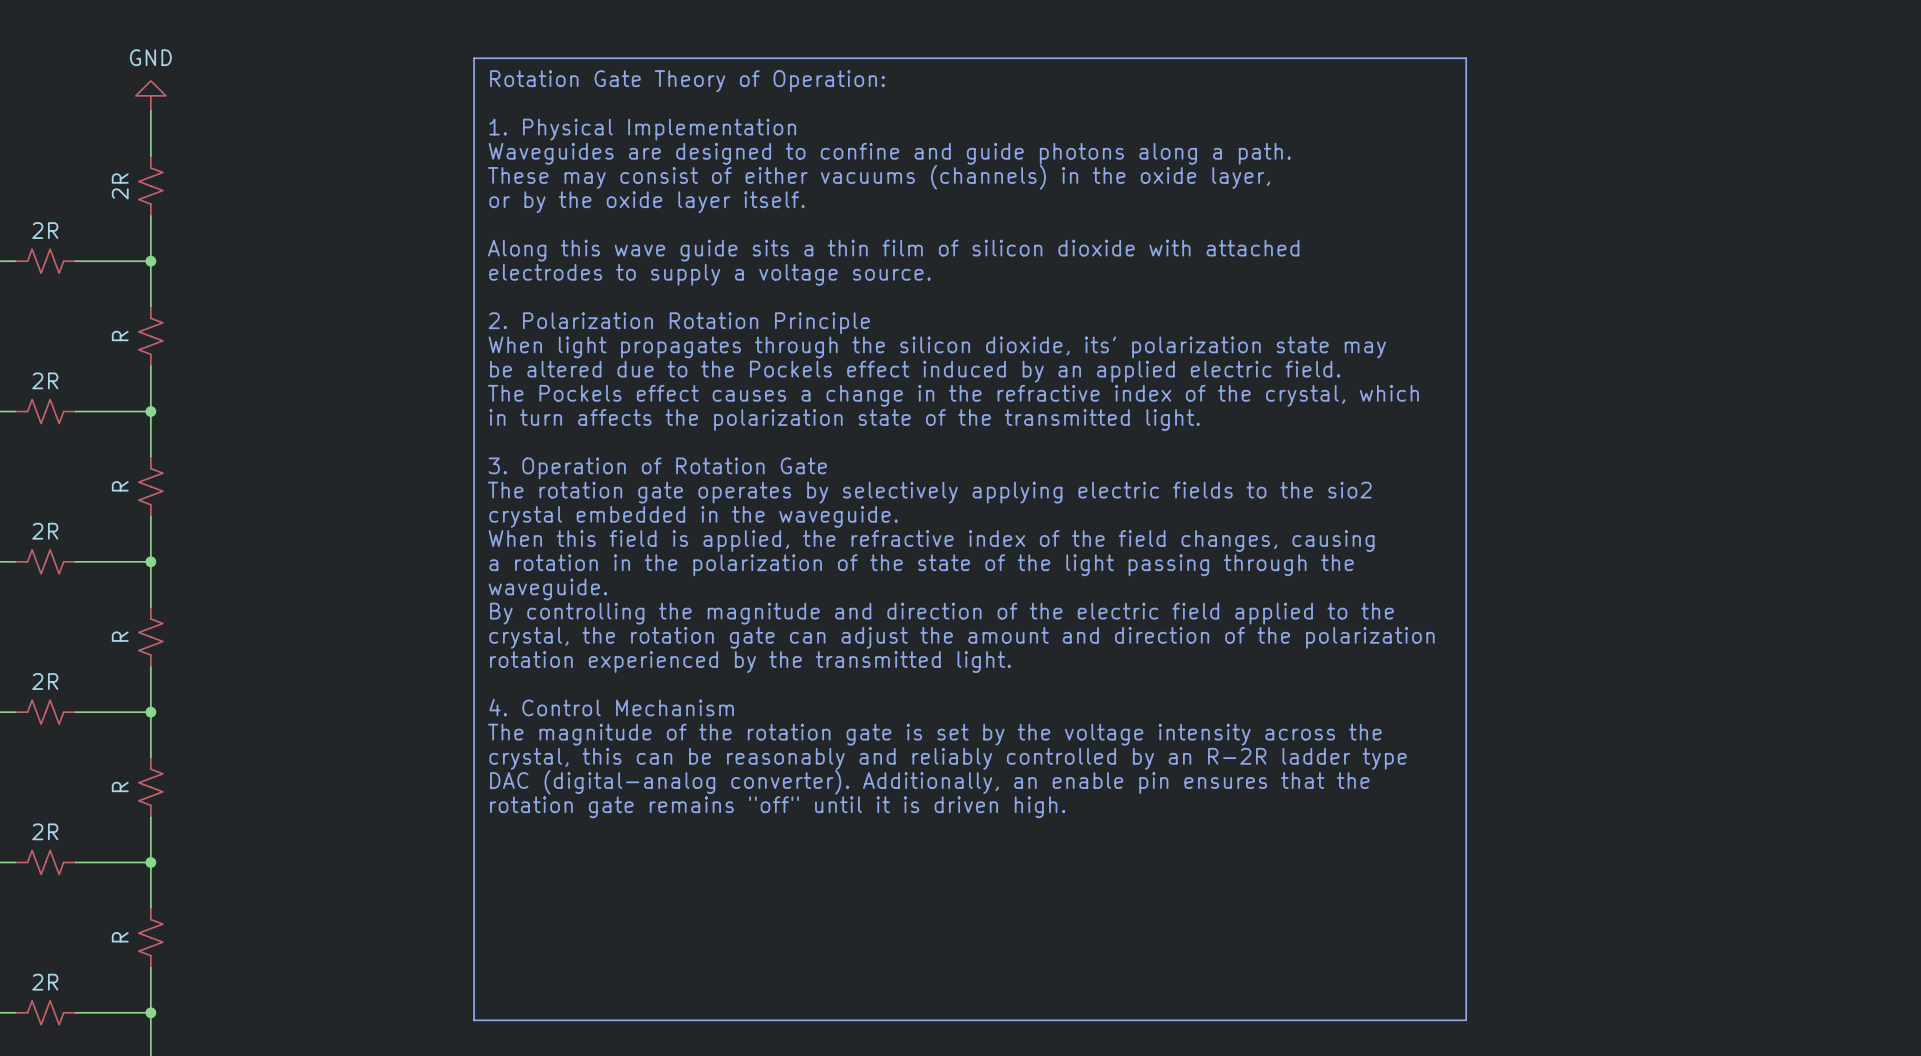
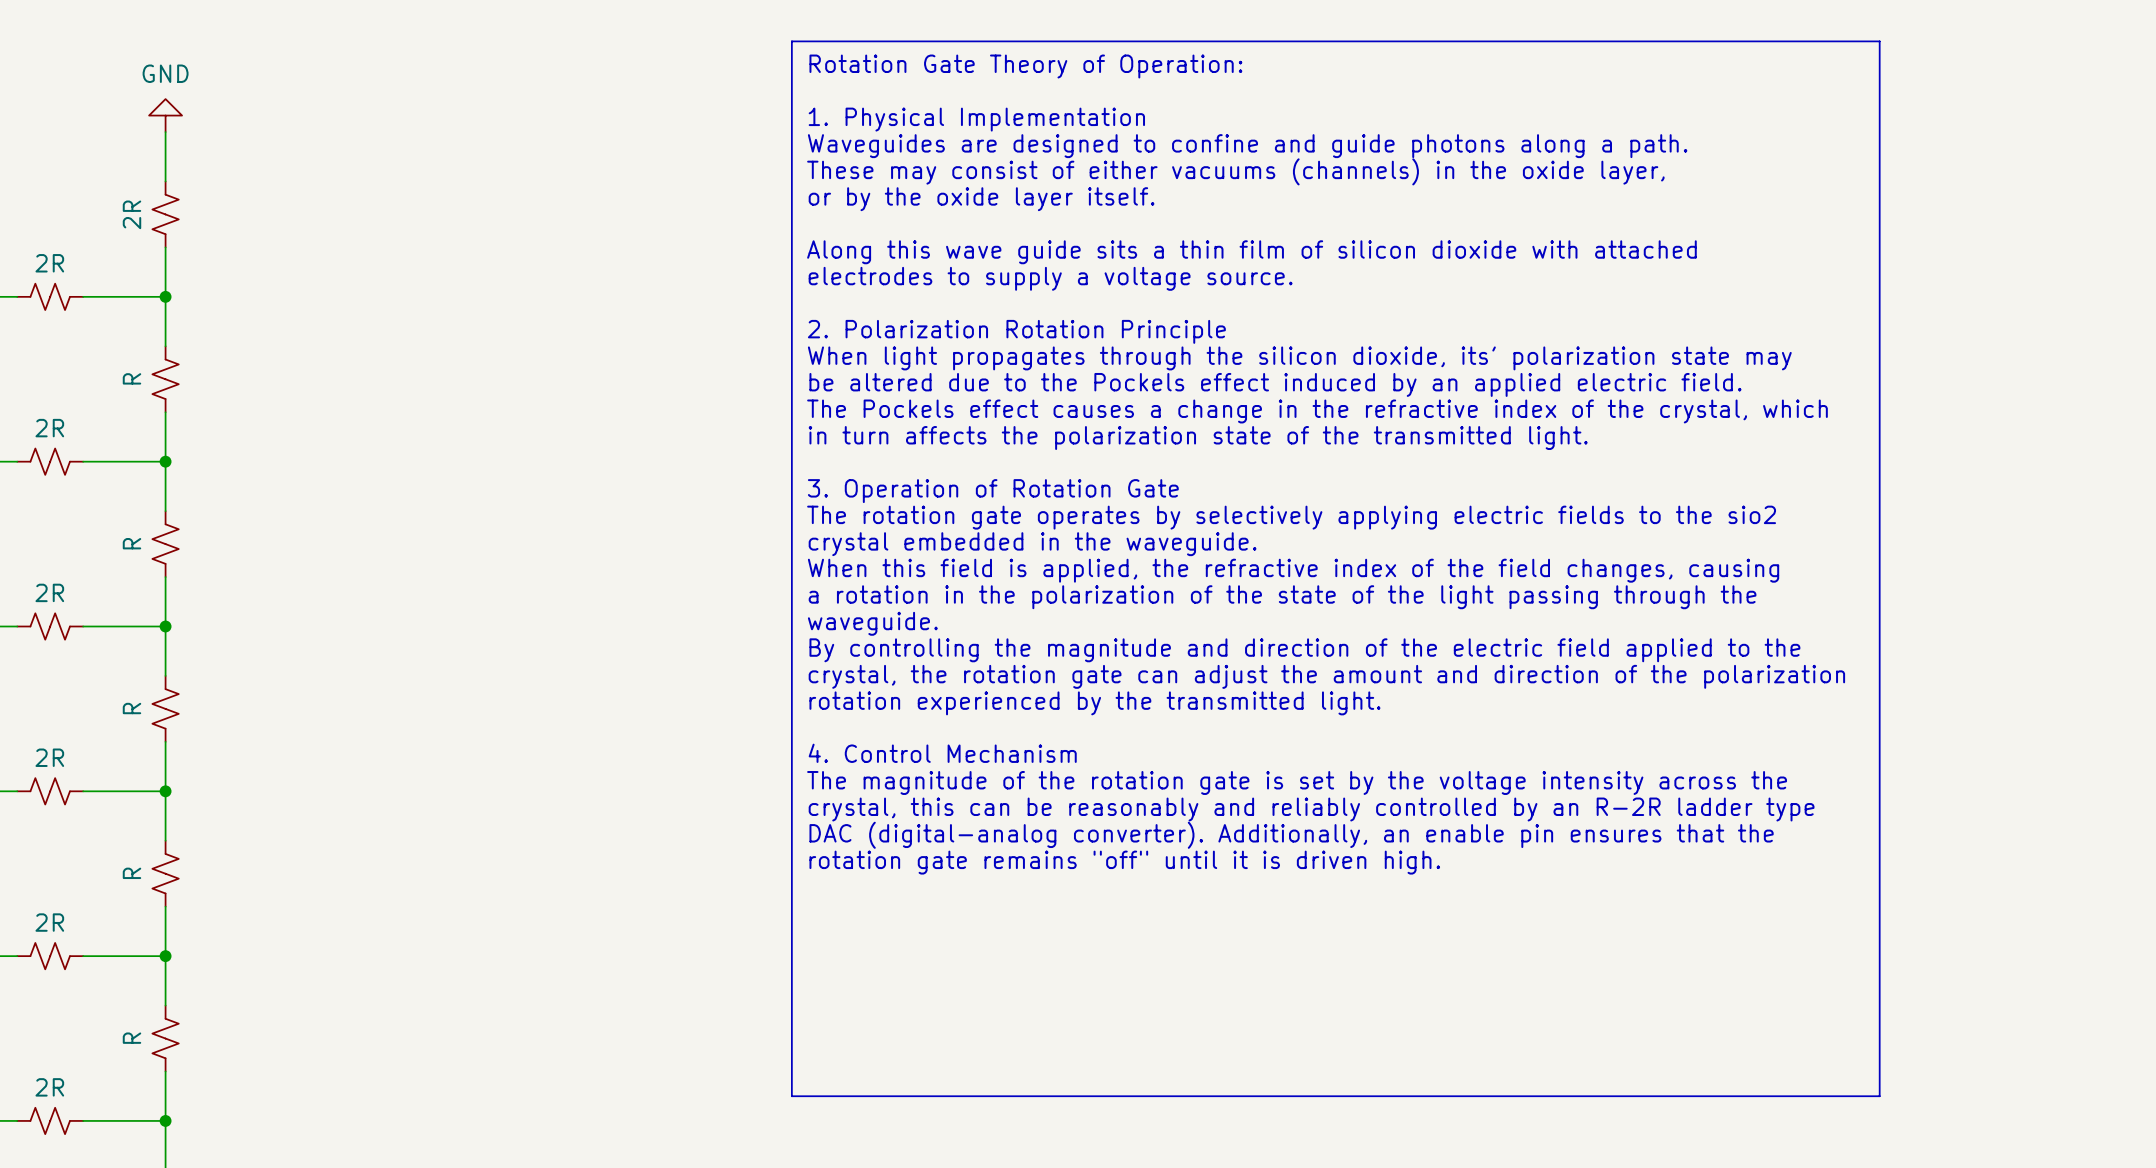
line: (474, 58) (1466, 58) (1466, 1020) (474, 1020) (474, 58) -> (791, 41) (1879, 41) (1879, 1096) (791, 1096) (791, 41)
text position: Rotation Gate Theory of Operation: (687, 81) -> Rotation Gate Theory of Operation: (1025, 66)
text position: 1. Physical Implementation (642, 129) -> 1. Physical Implementation (976, 119)
text position: Waveguides are designed to confine and guide photons along a path. (889, 153) -> Waveguides are designed to confine and guide photons along a path. (1247, 146)
text position: These may consist of either vacuums (channels) in the oxide layer, (878, 177) -> These may consist of either vacuums (channels) in the oxide layer, (1235, 171)
text position: or by the oxide layer itself. (647, 202) -> or by the oxide layer itself. (981, 199)
text position: Along this wave guide sits a thin film of silicon dioxide with attached (893, 250) -> Along this wave guide sits a thin film of silicon dioxide with attached (1251, 252)
text position: electrodes to supply a voltage source. (710, 274) -> electrodes to supply a voltage source. (1050, 278)
text position: 2. Polarization Rotation Principle (679, 323) -> 2. Polarization Rotation Principle (1016, 331)
text position: When light propagates through the silicon dioxide, its' polarization state may (937, 347) -> When light propagates through the silicon dioxide, its' polarization state may (1299, 358)
text position: be altered due to the Pockels effect induced by an applied electric field. (915, 371) -> be altered due to the Pockels effect induced by an applied electric field. (1275, 384)
text position: The Pockels effect causes a change in the refractive index of the crystal, which (953, 395) -> The Pockels effect causes a change in the refractive index of the crystal, which (1317, 411)
text position: in turn affects the polarization state of the transmitted light. (844, 420) -> in turn affects the polarization state of the transmitted light. (1198, 438)
text position: 3. Operation of Rotation Gate (657, 468) -> 3. Operation of Rotation Gate (993, 491)
text position: The rotation gate operates by selectively applying electric fields to the sio2 (929, 492) -> The rotation gate operates by selectively applying electric fields to the sio2 (1291, 517)
text position: crystal embedded in the waveguide. (693, 516) -> crystal embedded in the waveguide. (1032, 544)
text position: When this field is applied, the refractive index of the field changes, causing (931, 541) -> When this field is applied, the refractive index of the field changes, causing (1293, 570)
text position: a rotation in the polarization of the state of the light passing through the (921, 565) -> a rotation in the polarization of the state of the light passing through the (1282, 597)
text position: waveguide. (547, 589) -> waveguide. (872, 623)
text position: By controlling the magnitude and direction of the electric field applied to the (941, 613) -> By controlling the magnitude and direction of the electric field applied to the (1304, 650)
text position: crystal, the rotation gate can adjust the amount and direction of the polarization (962, 637) -> crystal, the rotation gate can adjust the amount and direction of the polarization (1326, 676)
text position: rotation experienced by the transmitted light. (750, 662) -> rotation experienced by the transmitted light. (1094, 703)
text position: 4. Control Mechanism (611, 707) -> 4. Control Mechanism (942, 753)
text position: The magnitude of the rotation gate is set by the voltage intensity across the (934, 734) -> The magnitude of the rotation gate is set by the voltage intensity across the (1297, 782)
text position: crystal, this can be reasonably and reliably controlled by an R-2R ladder type (948, 758) -> crystal, this can be reasonably and reliably controlled by an R-2R ladder type (1311, 809)
text position: DAC (digital-analog converter). Additionally, an enable pin ensures that the (929, 782) -> DAC (digital-analog converter). Additionally, an enable pin ensures that the (1291, 835)
text position: rotation gate remains "off" until it is driven high. (777, 807) -> rotation gate remains "off" until it is driven high. (1124, 862)

